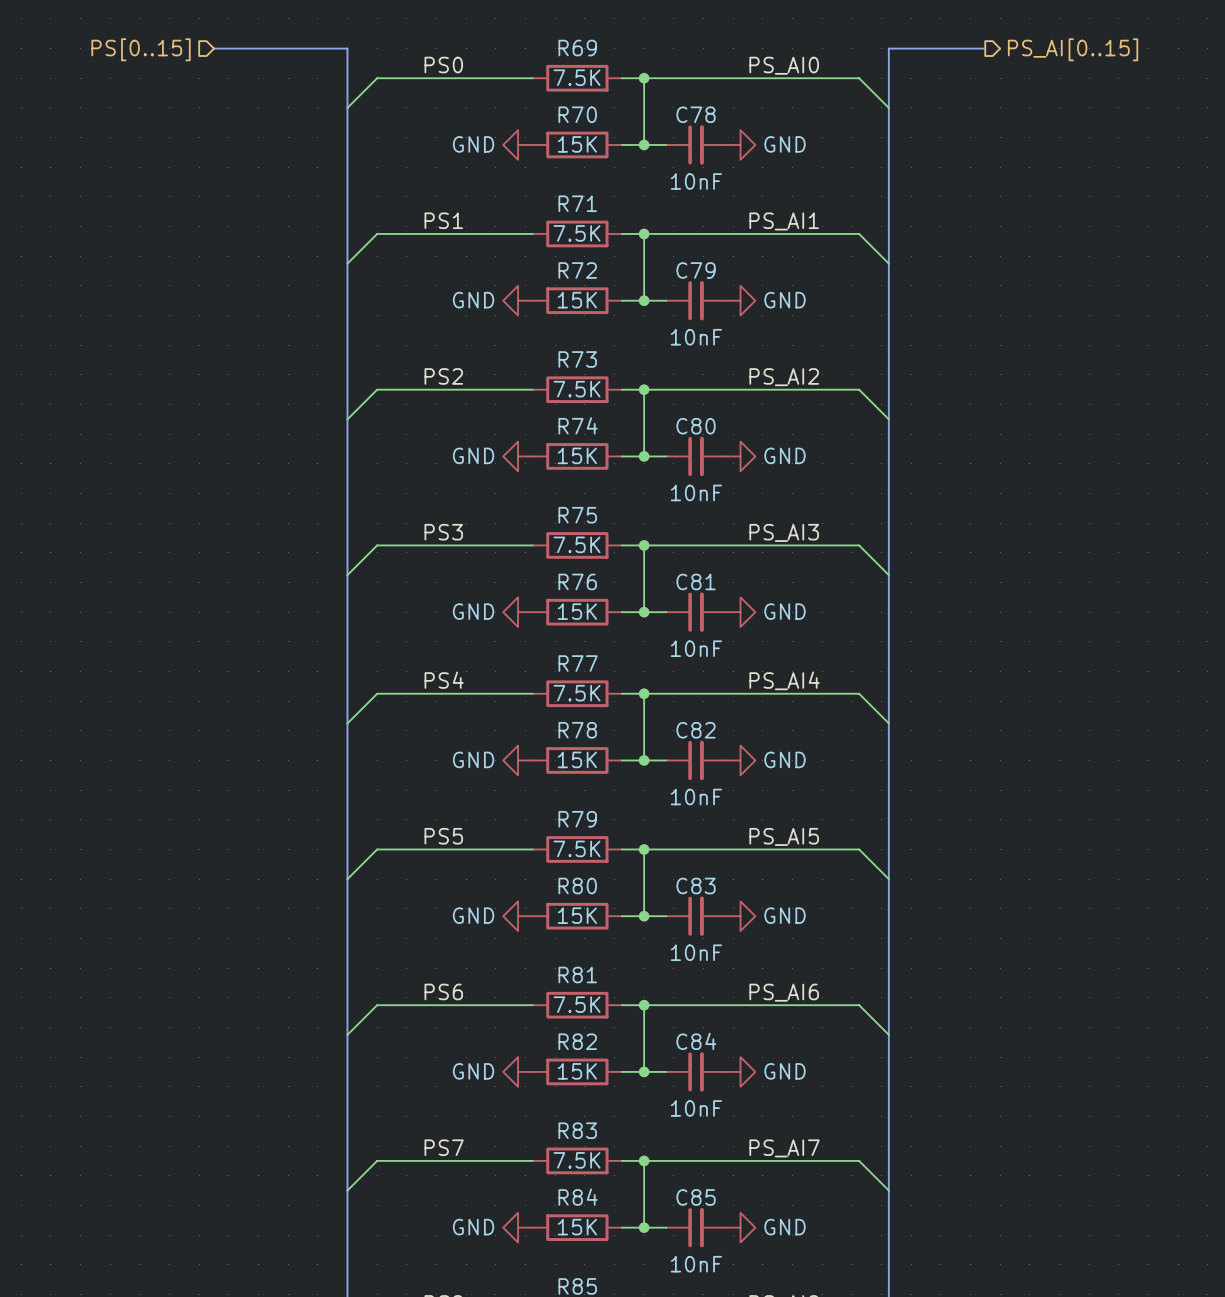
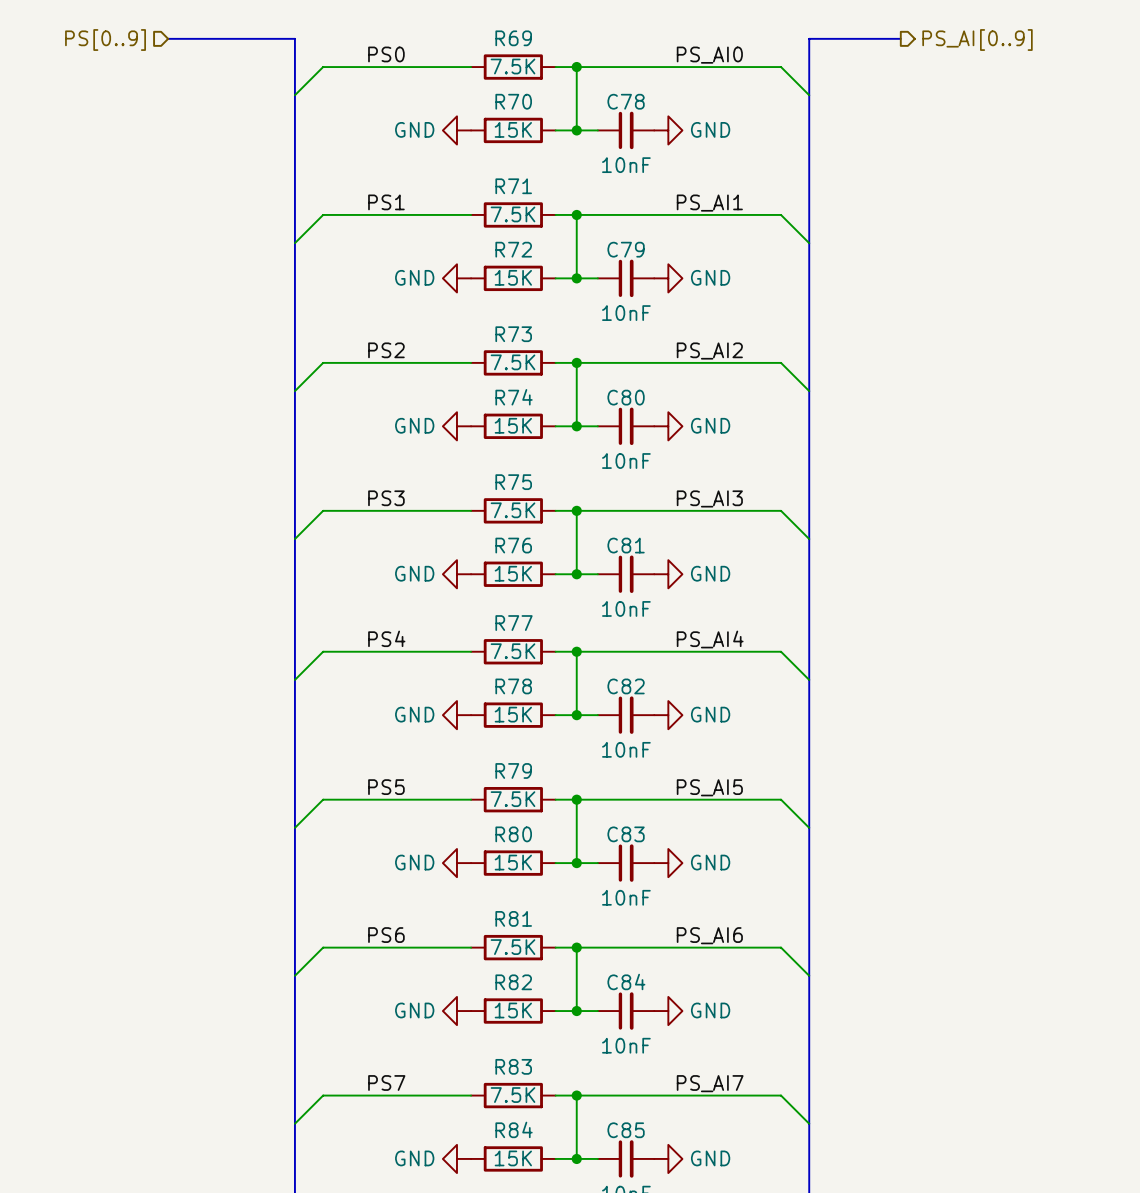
hierarchical label: PS[0..15] (141, 49) -> PS[0..9] (105, 40)
hierarchical label: PS_AI[0..15] (1073, 49) -> PS_AI[0..9] (977, 40)

